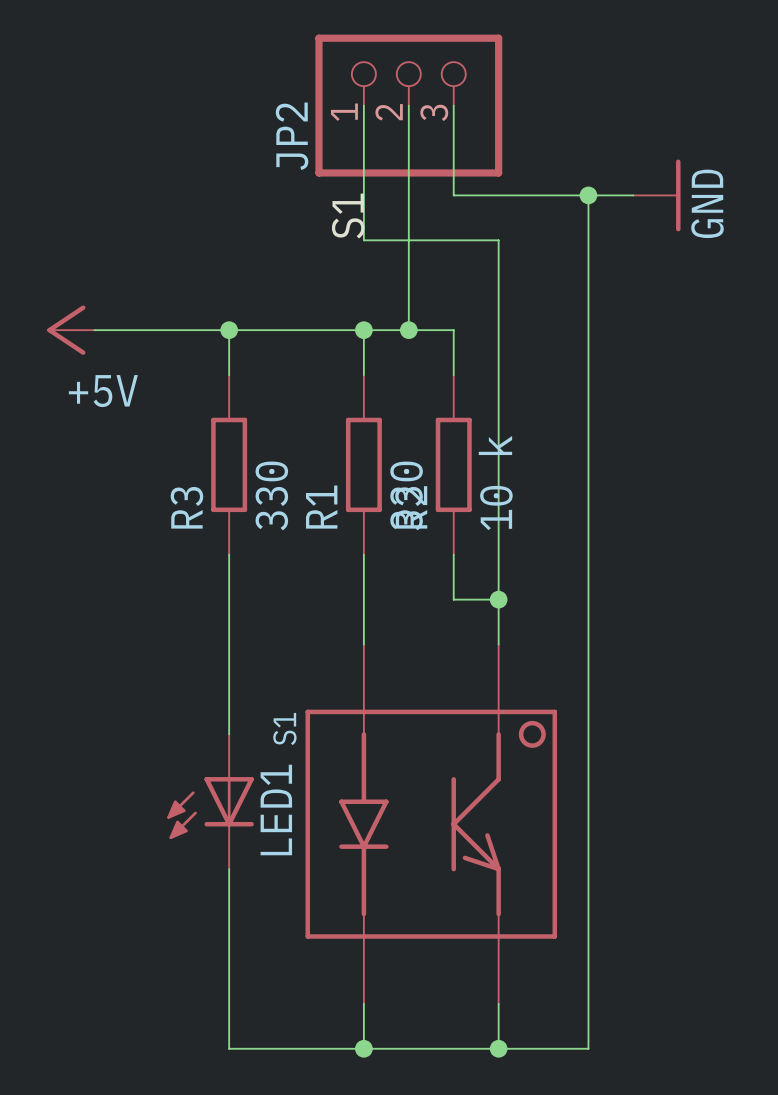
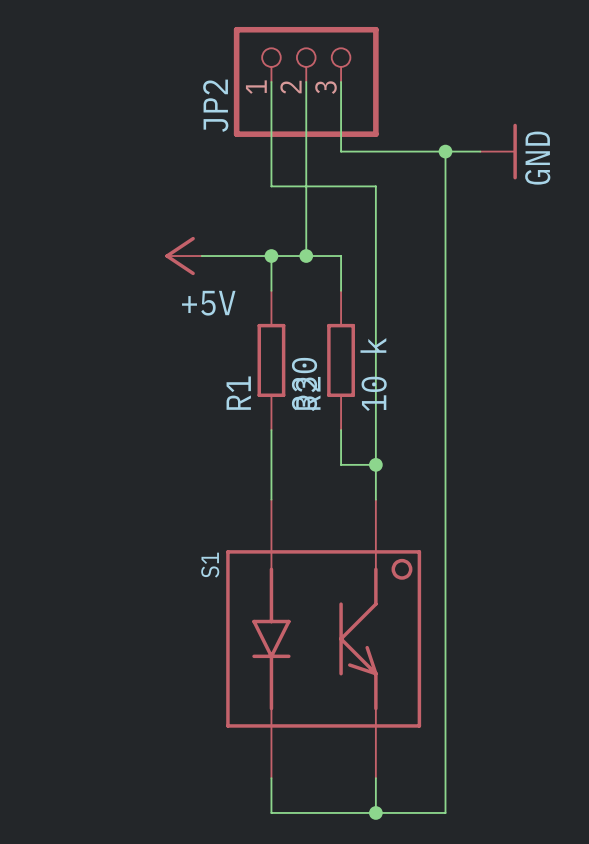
label: S1 (348, 216) -> none
power symbol position: +5V (70, 330) -> +5V (183, 256)
wire: (94, 330) (274, 330) -> none
wire: (229, 330) (229, 375) -> none
junction: (229, 330) -> none
R3: 330 (229, 464) -> none
wire: (229, 554) (229, 734) -> none
LED1: (210, 801) -> none
wire: (229, 869) (229, 1048) (363, 1048) -> none
junction: (363, 1048) -> none

